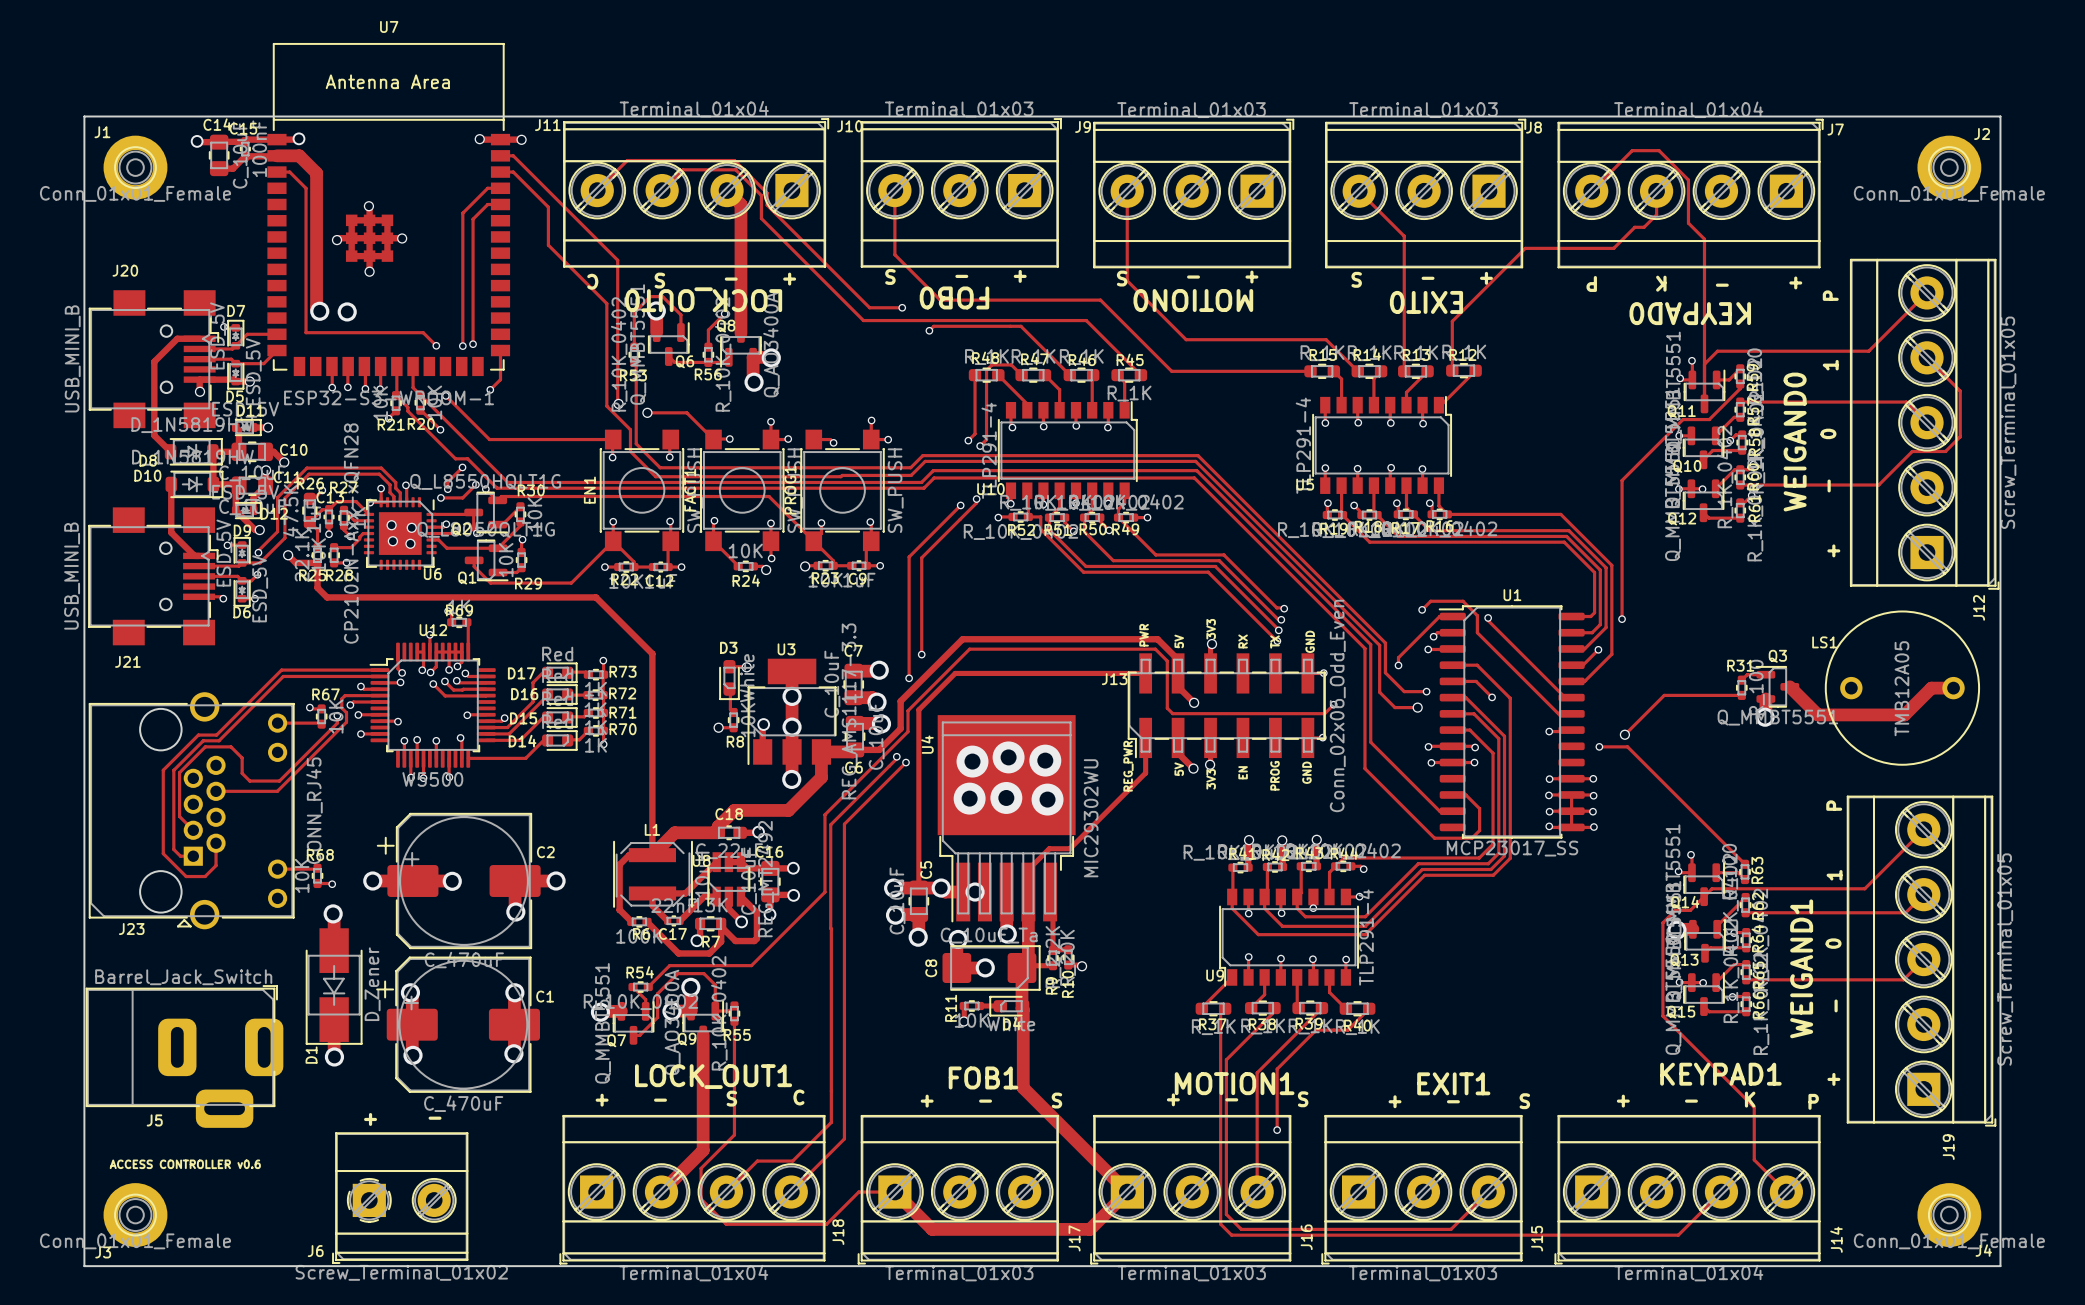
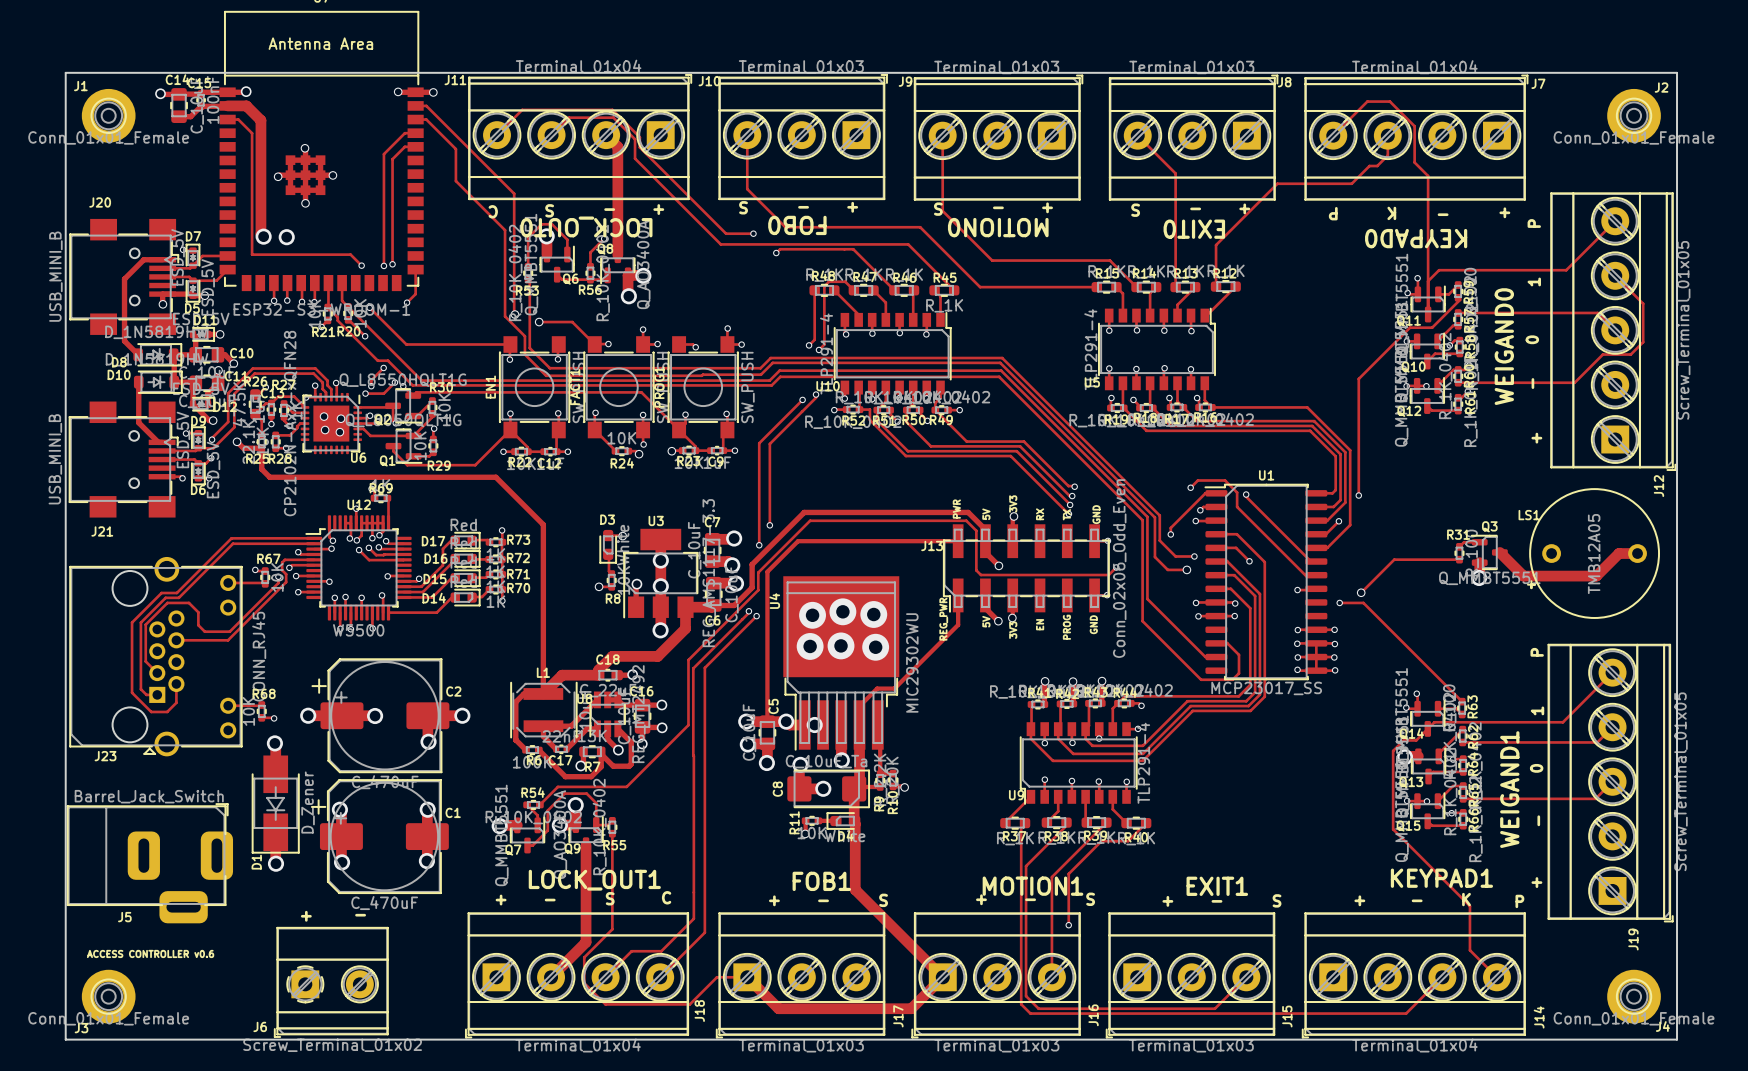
LS1 footprint: [1825, 610, 1980, 766] -> [1527, 488, 1660, 619]

